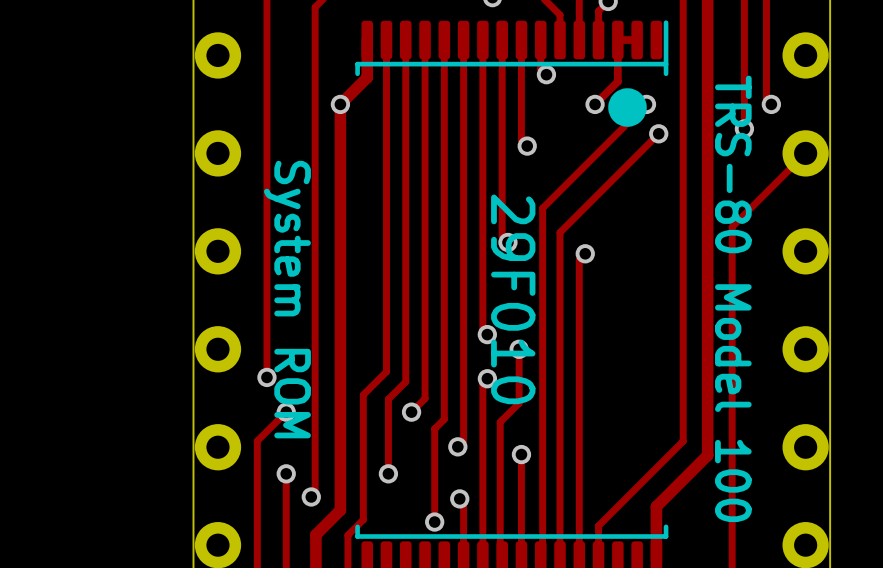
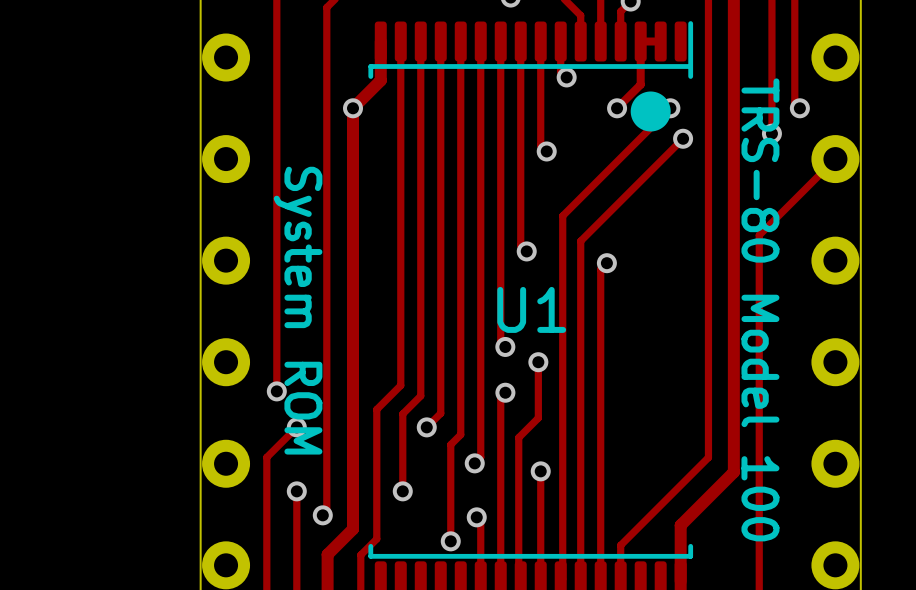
U1 name: none -> U1 (531, 309)
U1 value: 29F010 (513, 299) -> none

